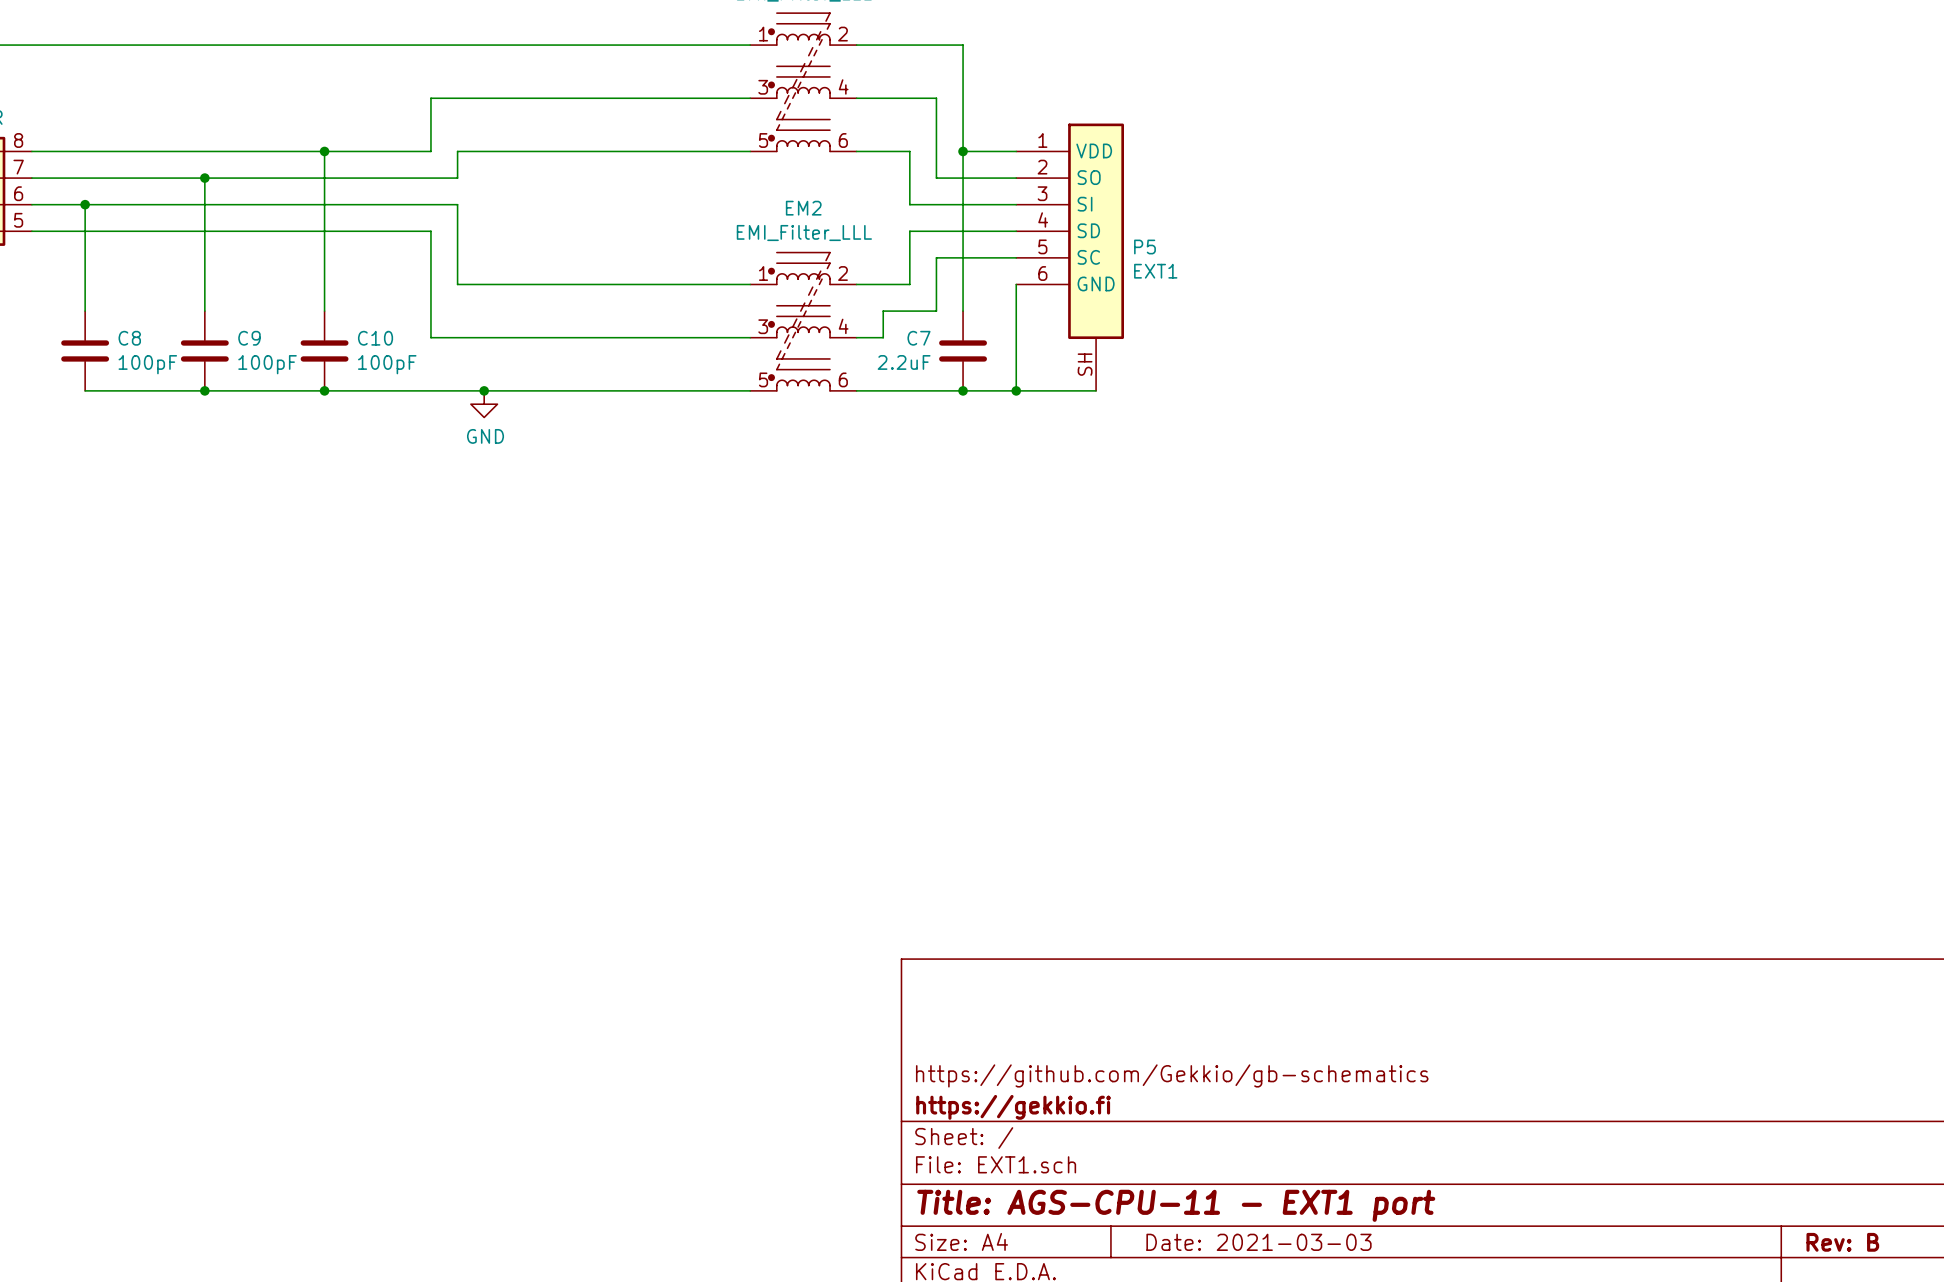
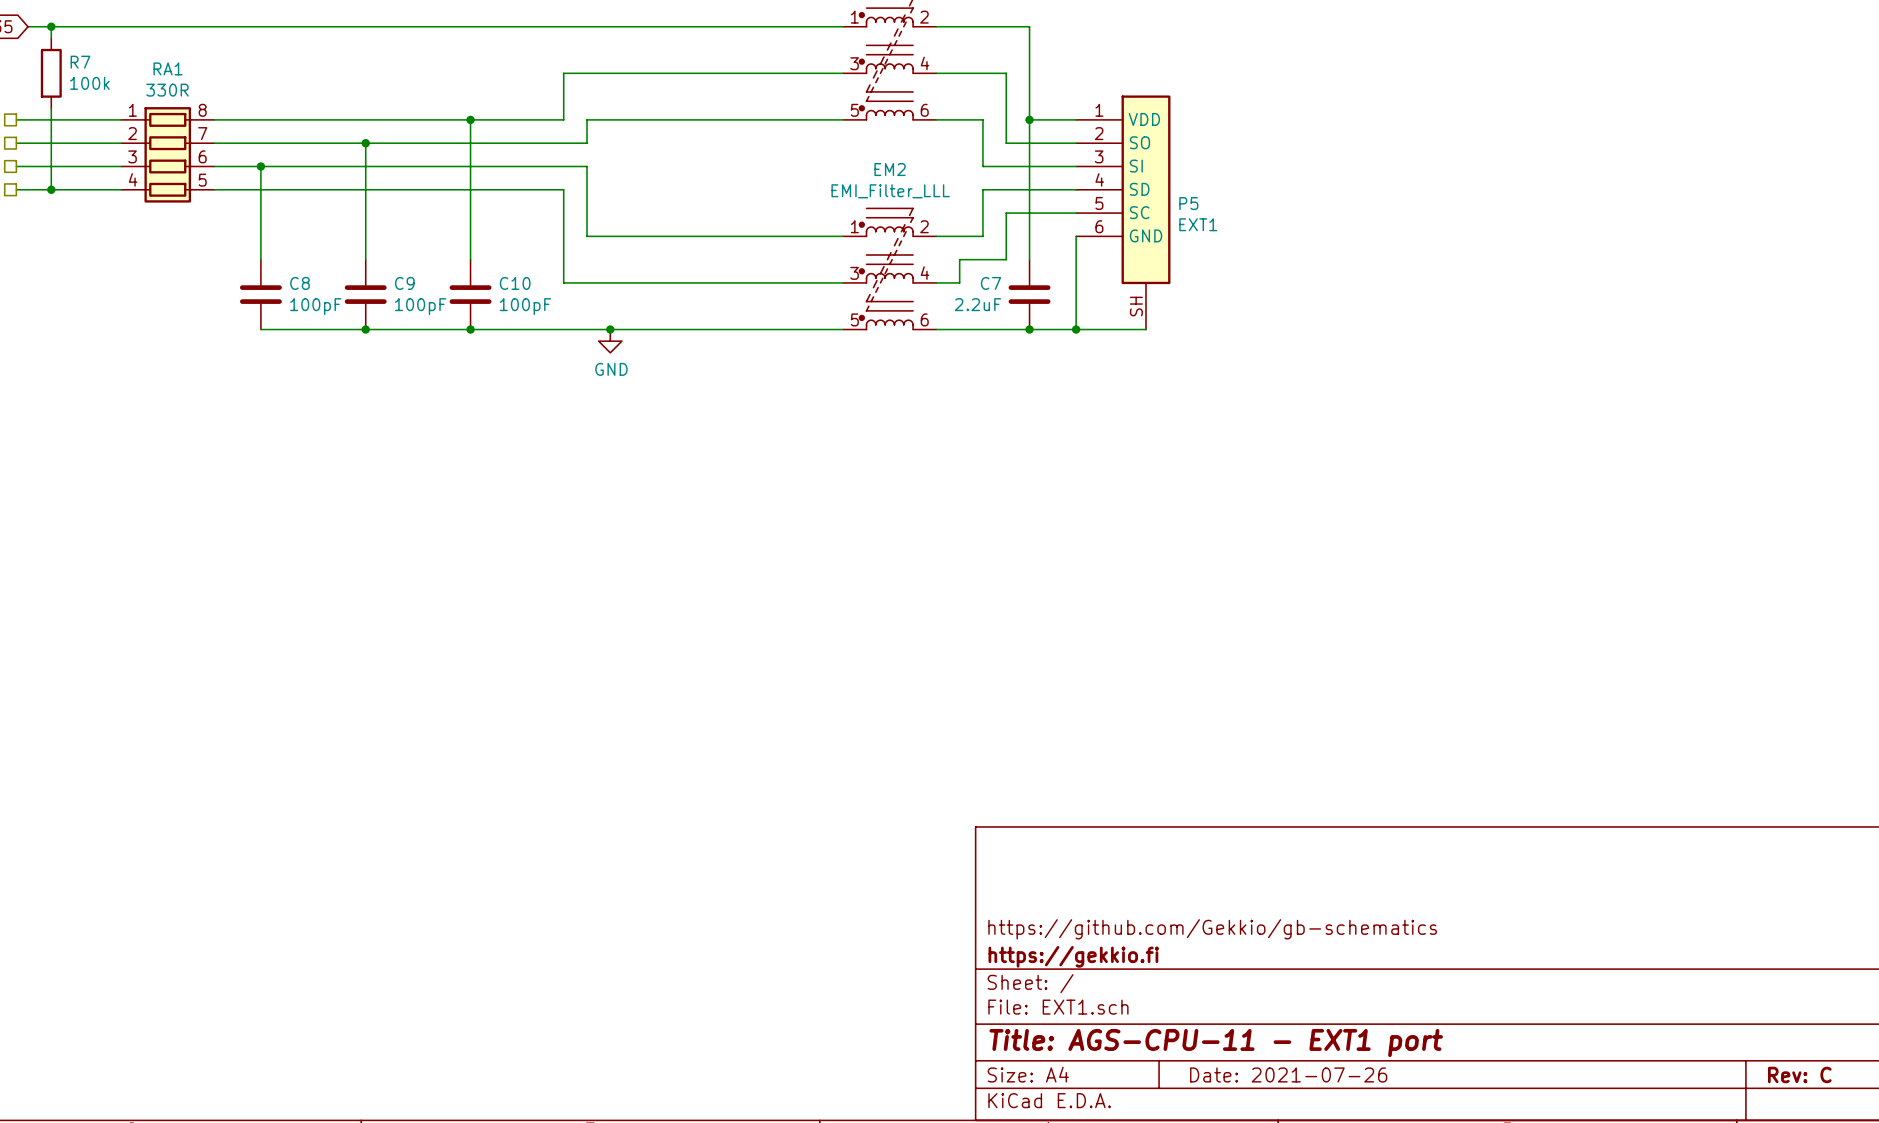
title block: Date: 2021-03-03 (1259, 1242) -> Date: 2021-07-26 (1288, 1074)
title block: Rev: B (1842, 1242) -> Rev: C (1799, 1074)

